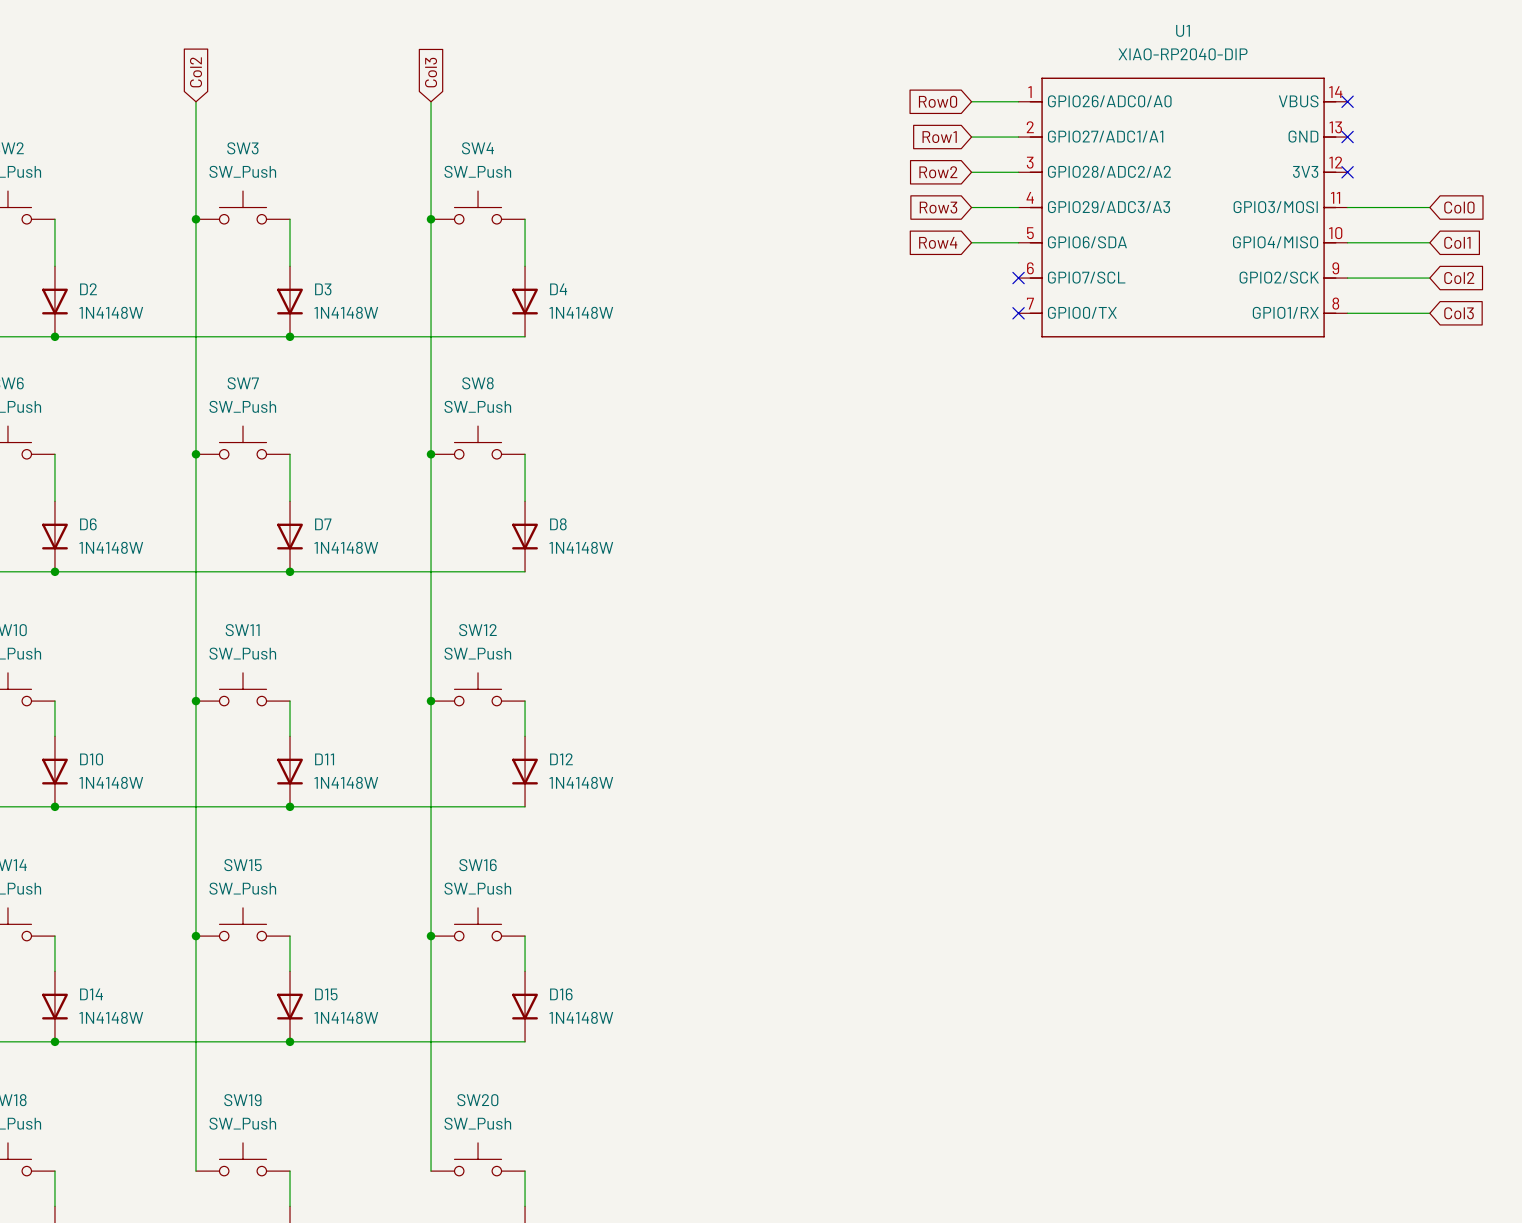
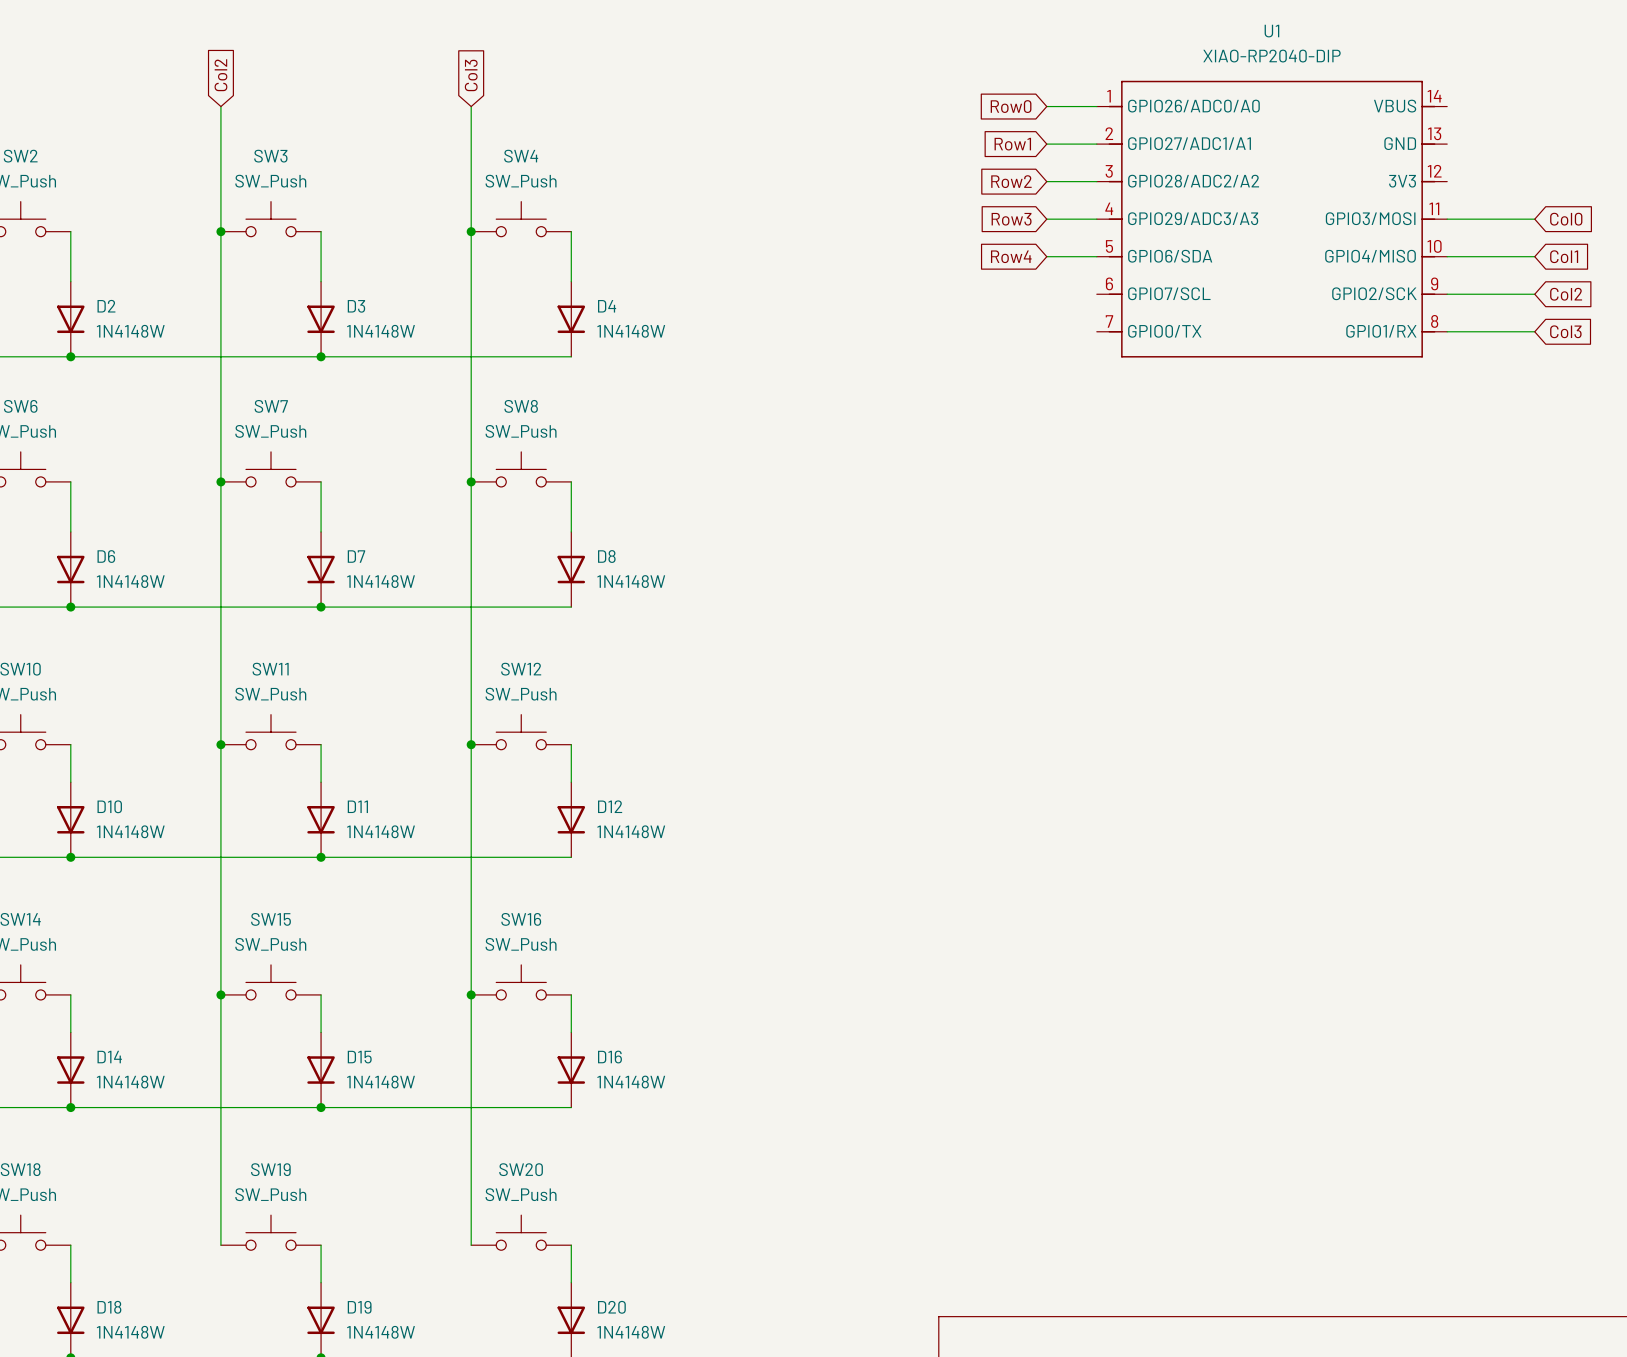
no-connect mark: (1347, 101) -> none
no-connect mark: (1347, 137) -> none
no-connect mark: (1347, 172) -> none
no-connect mark: (1018, 278) -> none
no-connect mark: (1018, 313) -> none

